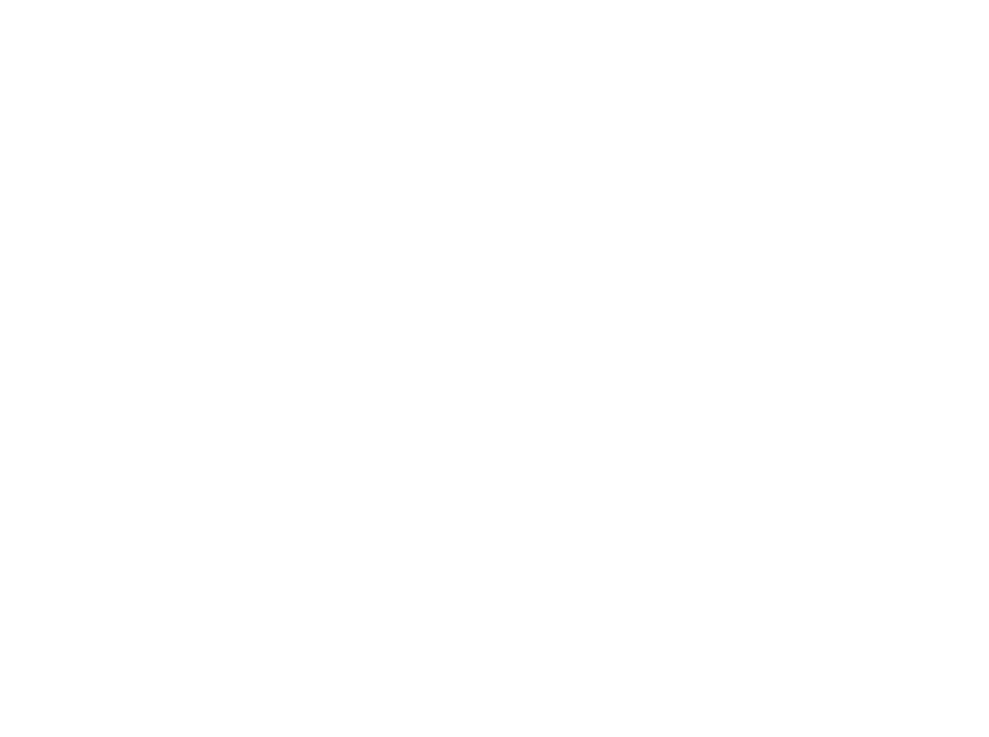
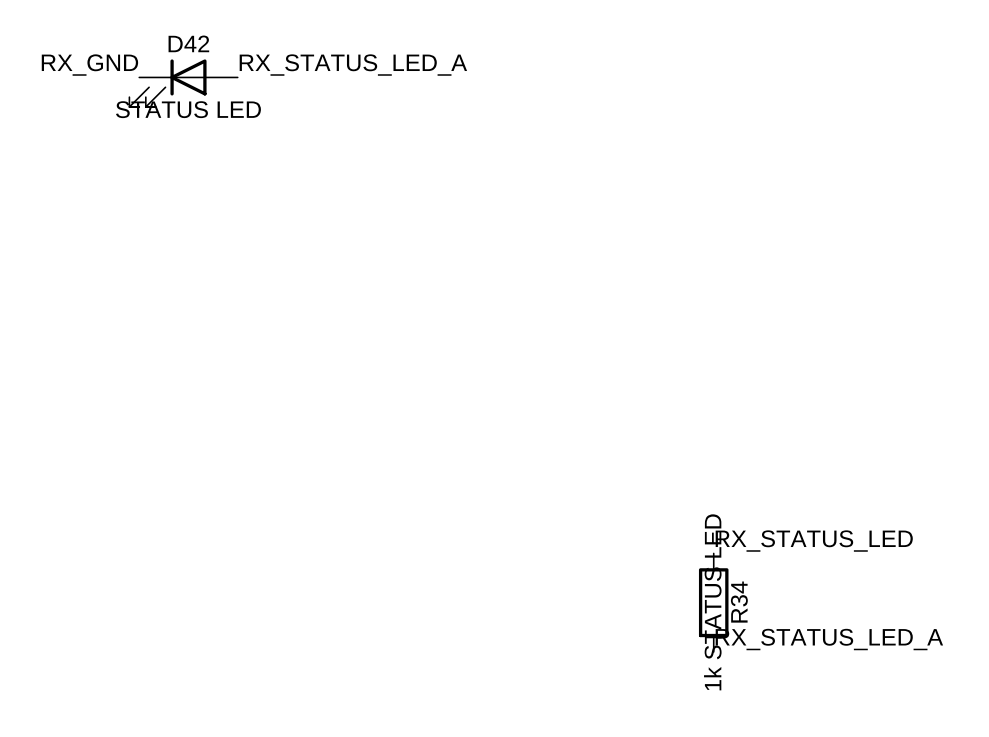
label: none -> RX_GND (89, 65)
label: none -> RX_STATUS_LED_A (353, 65)
D42: none -> STATUS LED (183, 83)
label: none -> RX_STATUS_LED (814, 541)
R34: none -> 1k STATUS LED (713, 602)
label: none -> RX_STATUS_LED_A (829, 639)

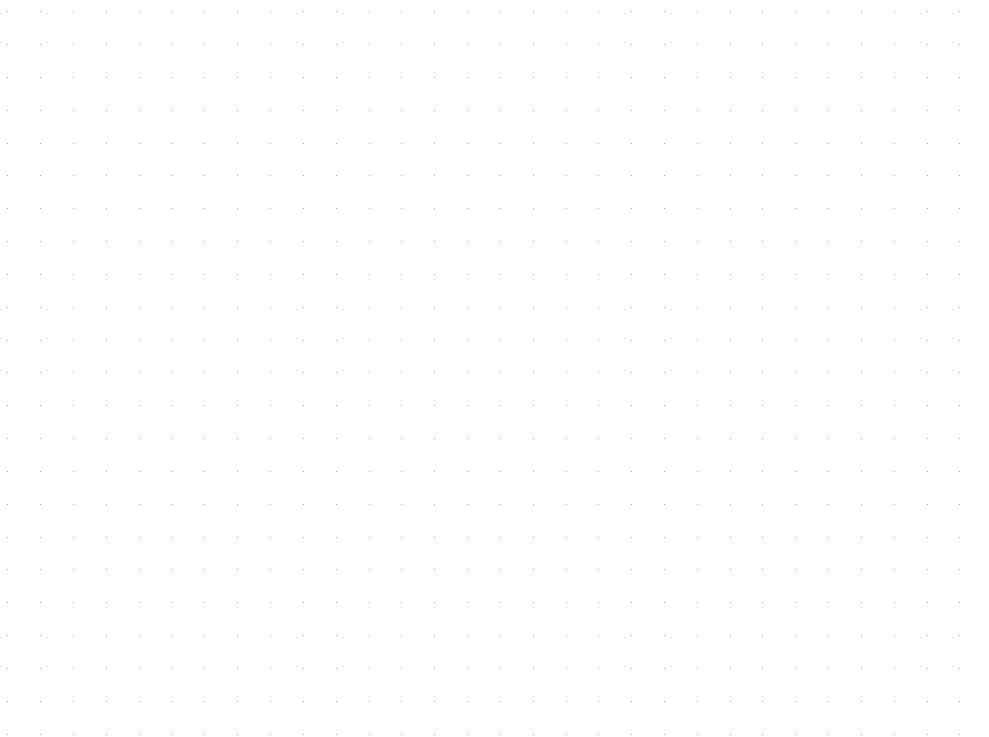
label: RX_GND (89, 65) -> none
label: RX_STATUS_LED_A (353, 65) -> none
D42: STATUS LED (183, 83) -> none
label: RX_STATUS_LED (814, 541) -> none
R34: 1k STATUS LED (713, 602) -> none
label: RX_STATUS_LED_A (829, 639) -> none

